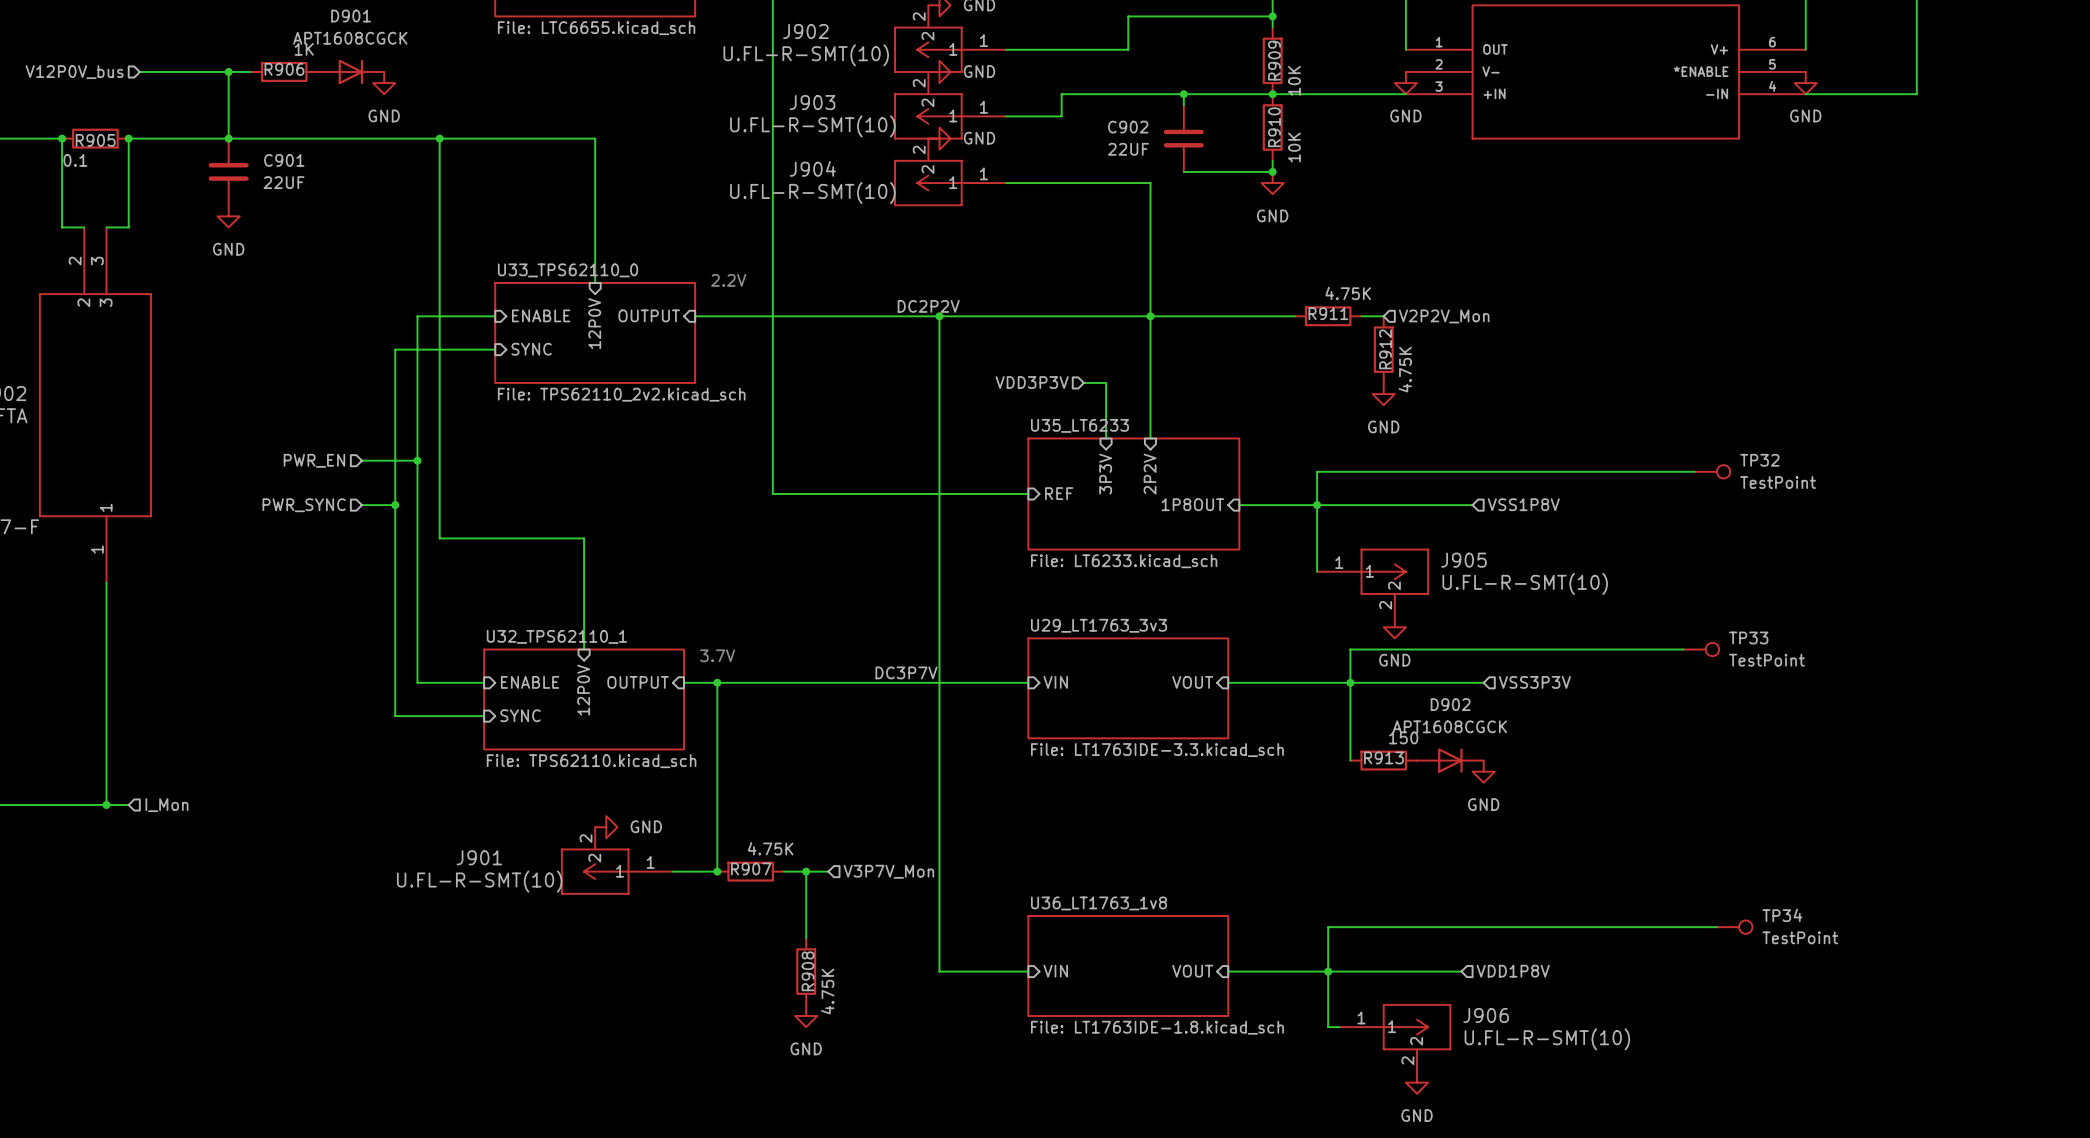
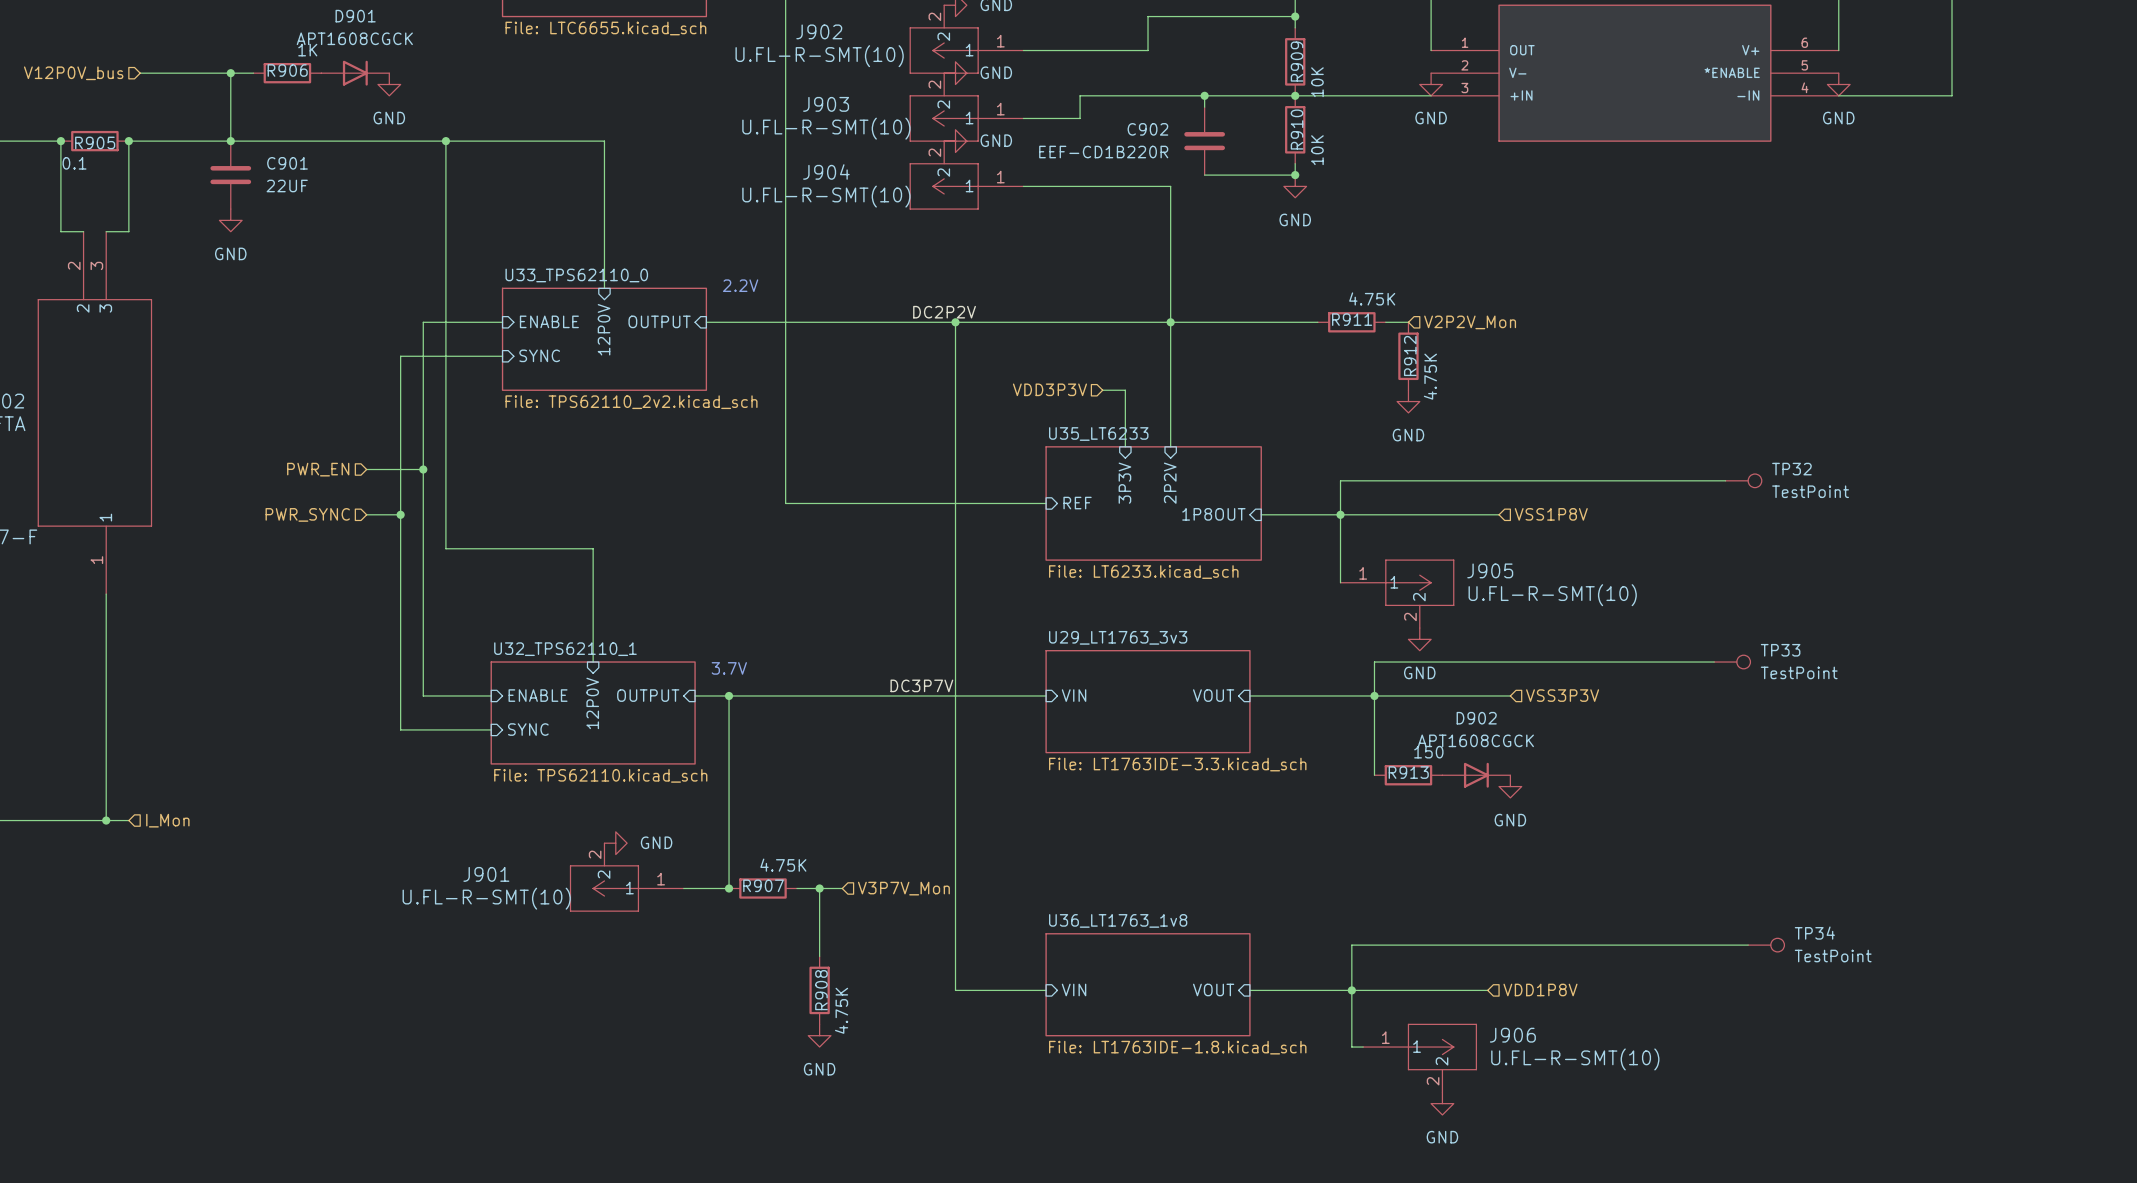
C902 value: 22UF (1128, 149) -> EEF-CD1B220R (1103, 152)

